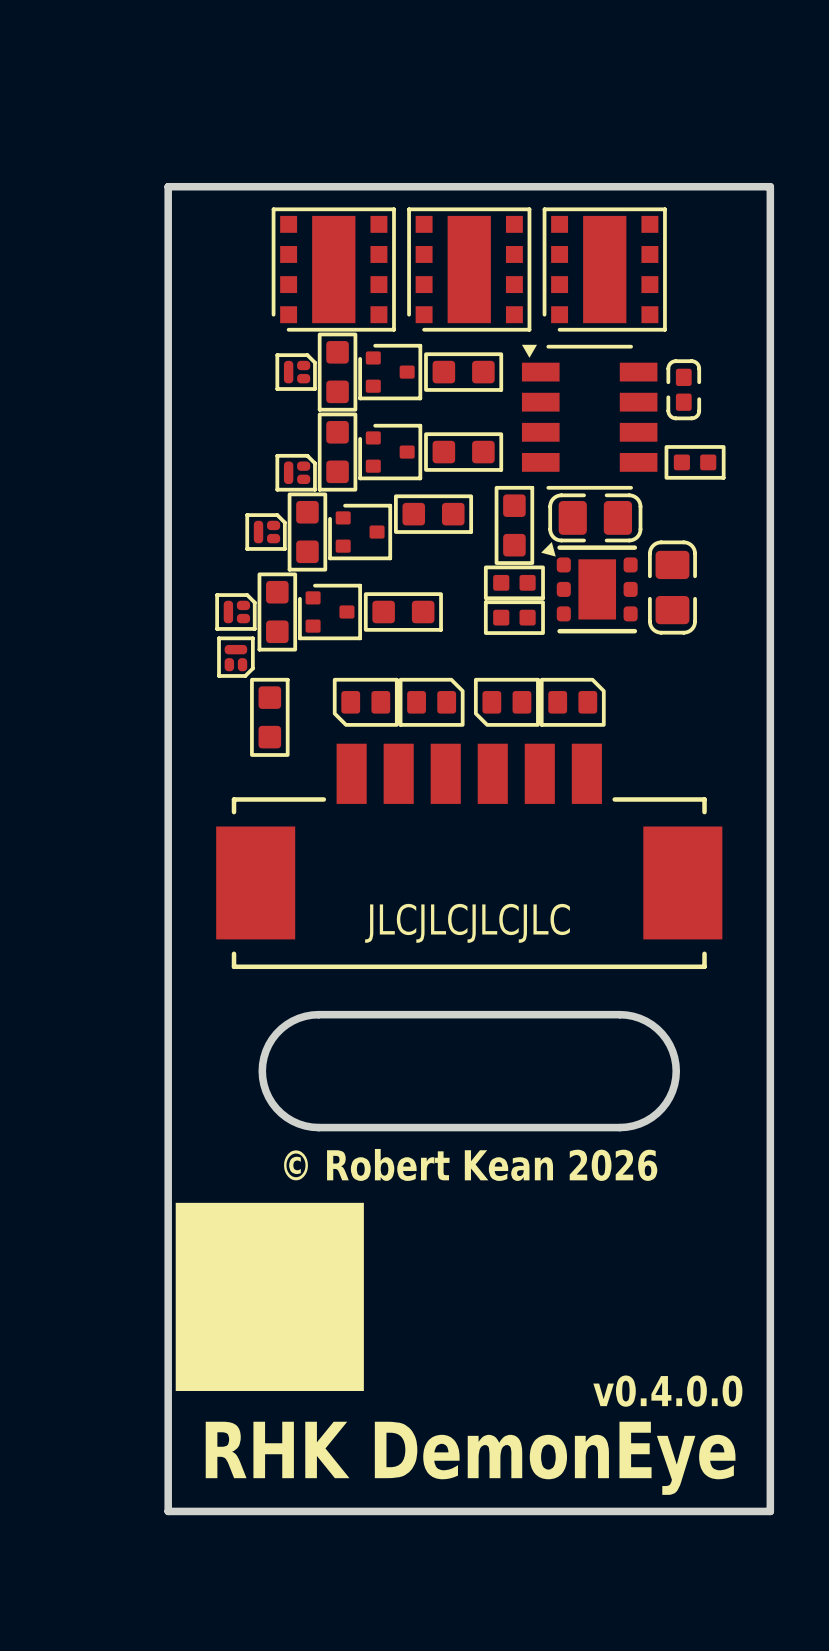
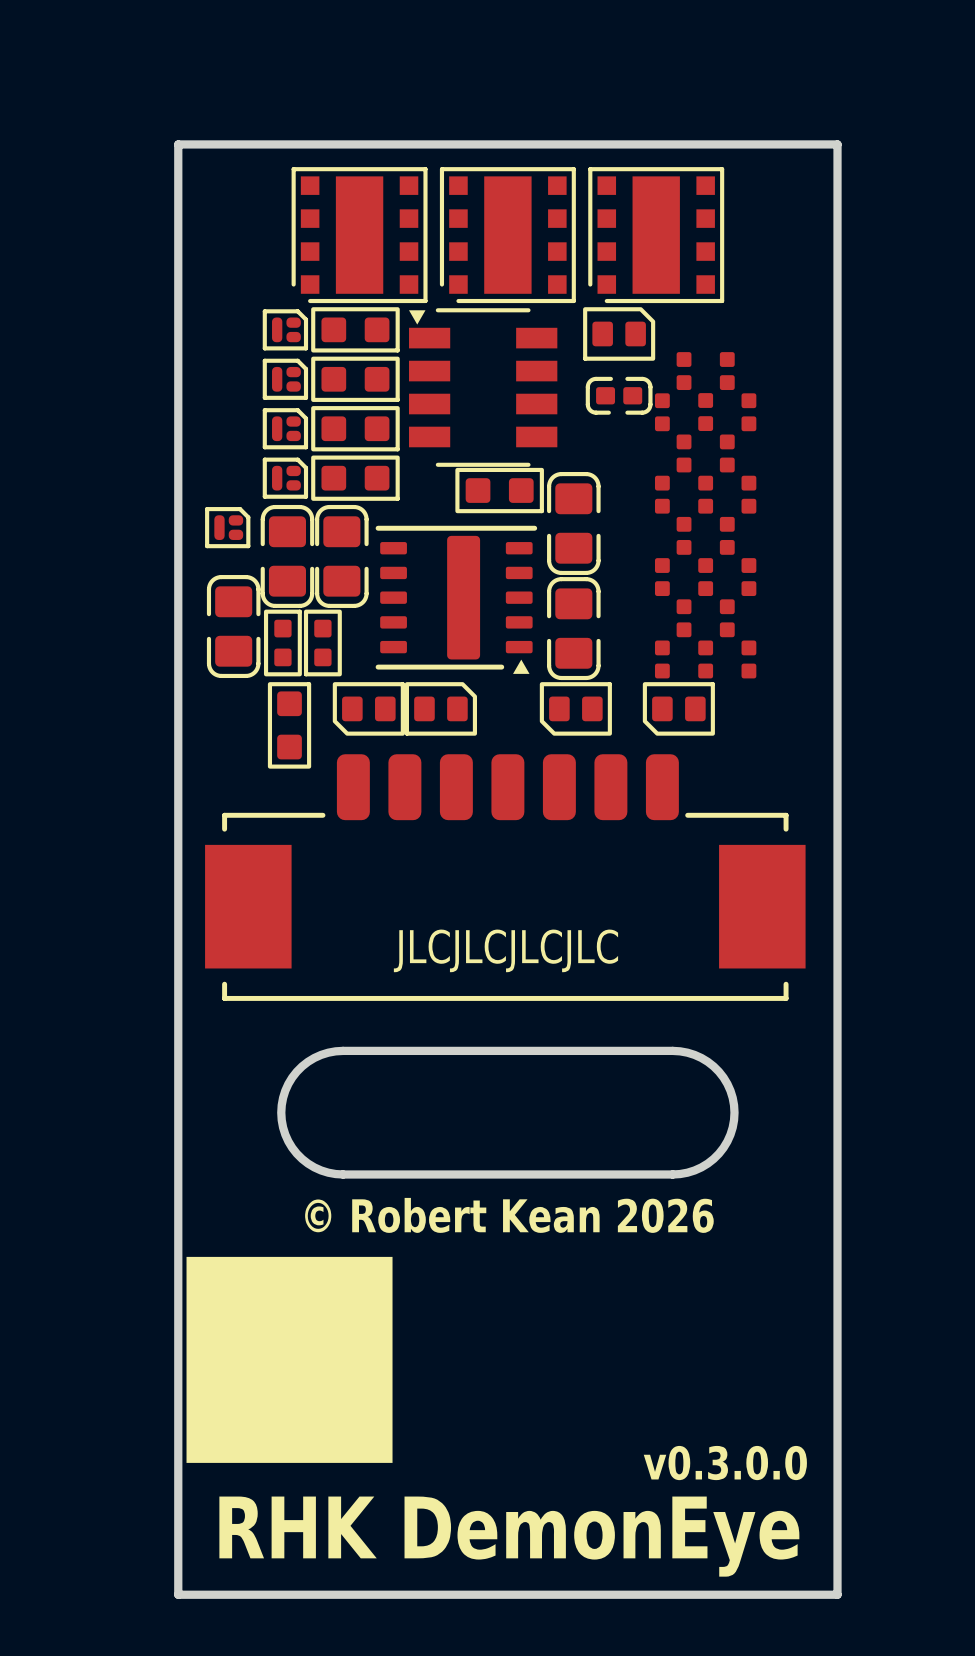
part: none -> (285, 329)
part: none -> (355, 329)
part: none -> (619, 333)
part footprint: [666, 359, 702, 421] -> [719, 352, 735, 391]
part: (296, 372) -> none
part: (337, 372) -> none
part: (390, 372) -> none
part: (463, 372) -> none
part: none -> (684, 371)
part: none -> (285, 379)
part: none -> (355, 379)
part: none -> (483, 387)
part footprint: [317, 412, 358, 492] -> [311, 406, 400, 452]
part: none -> (619, 395)
part: (589, 417) -> none
part: none -> (662, 412)
part: none -> (705, 412)
part: none -> (748, 412)
part: none -> (285, 428)
part: (390, 452) -> none
part: (463, 452) -> none
part: (695, 462) -> none
part: none -> (684, 453)
part: none -> (727, 453)
part: (296, 472) -> none
part footprint: [494, 485, 535, 565] -> [547, 472, 601, 576]
part: none -> (285, 478)
part: none -> (355, 478)
part footprint: [548, 493, 643, 543] -> [654, 475, 670, 514]
part: none -> (499, 490)
part: none -> (705, 494)
part: none -> (748, 494)
part: (433, 514) -> none
part: (266, 532) -> none
part: (307, 532) -> none
part: (360, 532) -> none
part: none -> (227, 527)
part footprint: [541, 542, 638, 634] -> [654, 558, 670, 597]
part: none -> (684, 535)
part: none -> (727, 535)
part: none -> (287, 556)
part: none -> (341, 556)
part: none -> (705, 577)
part: none -> (748, 577)
part: (514, 582) -> none
part: (672, 587) -> none
part footprint: [363, 592, 443, 632] -> [375, 525, 538, 674]
part footprint: [483, 600, 545, 635] -> [547, 577, 601, 681]
part: (235, 611) -> none
part: (277, 611) -> none
part: (330, 611) -> none
part: none -> (684, 618)
part: none -> (727, 618)
part: none -> (233, 626)
part: none -> (282, 642)
part: none -> (322, 642)
part: (235, 657) -> none
part: none -> (662, 659)
part: none -> (705, 659)
part: none -> (748, 659)
part: none -> (368, 708)
part: (365, 702) -> none
part: none -> (440, 708)
part: (431, 702) -> none
part: (506, 702) -> none
part: none -> (575, 708)
part: (572, 702) -> none
part: none -> (678, 708)
part footprint: [216, 743, 723, 970] -> [205, 754, 806, 1001]
text: v0.4.0.0 (667, 1391) -> v0.3.0.0 (725, 1463)

